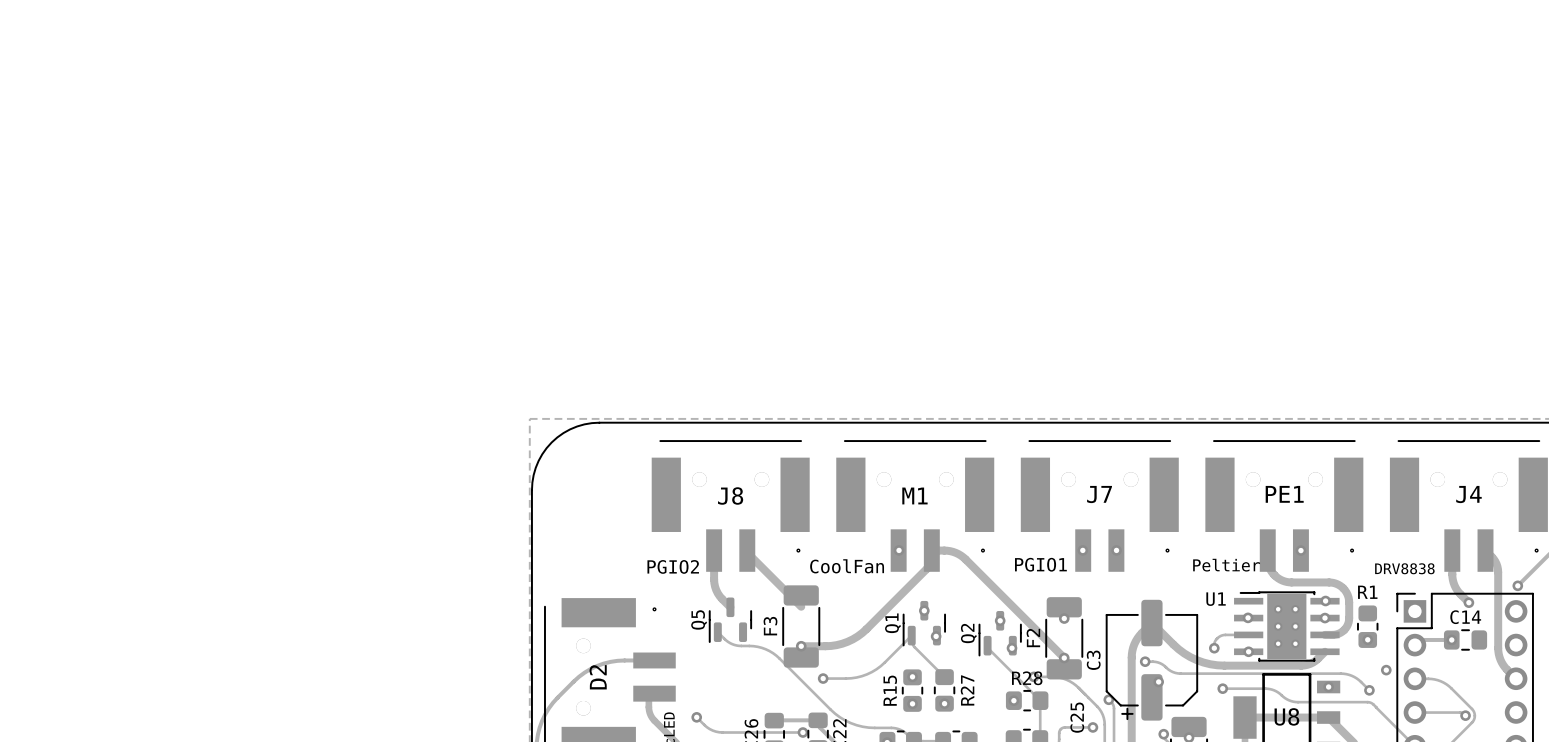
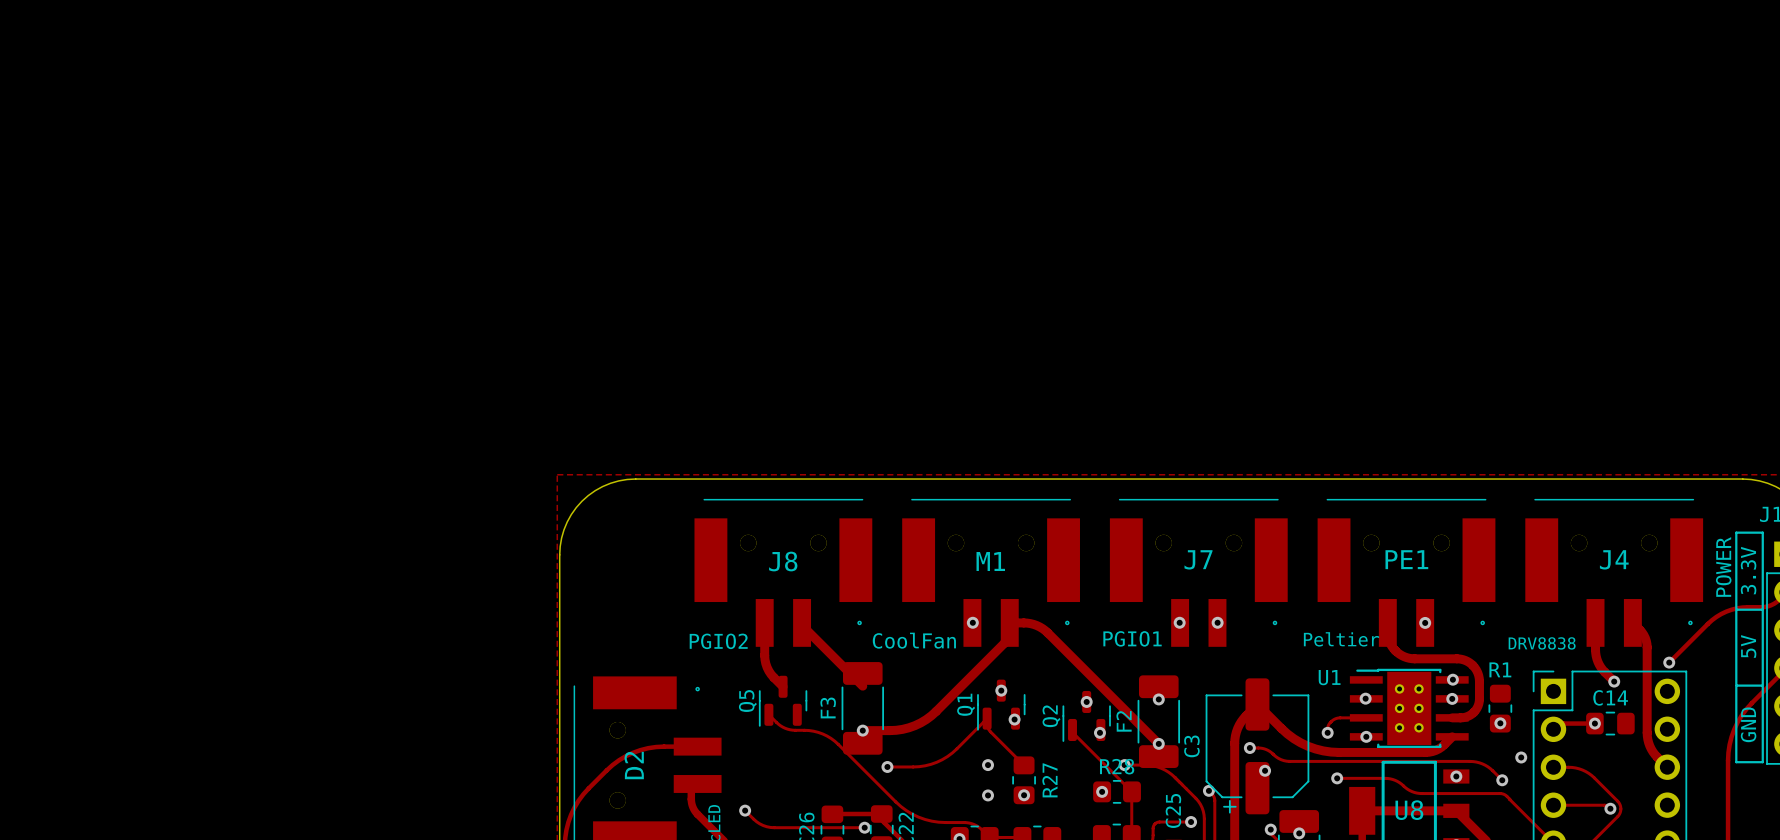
R15: (912, 690) -> none

